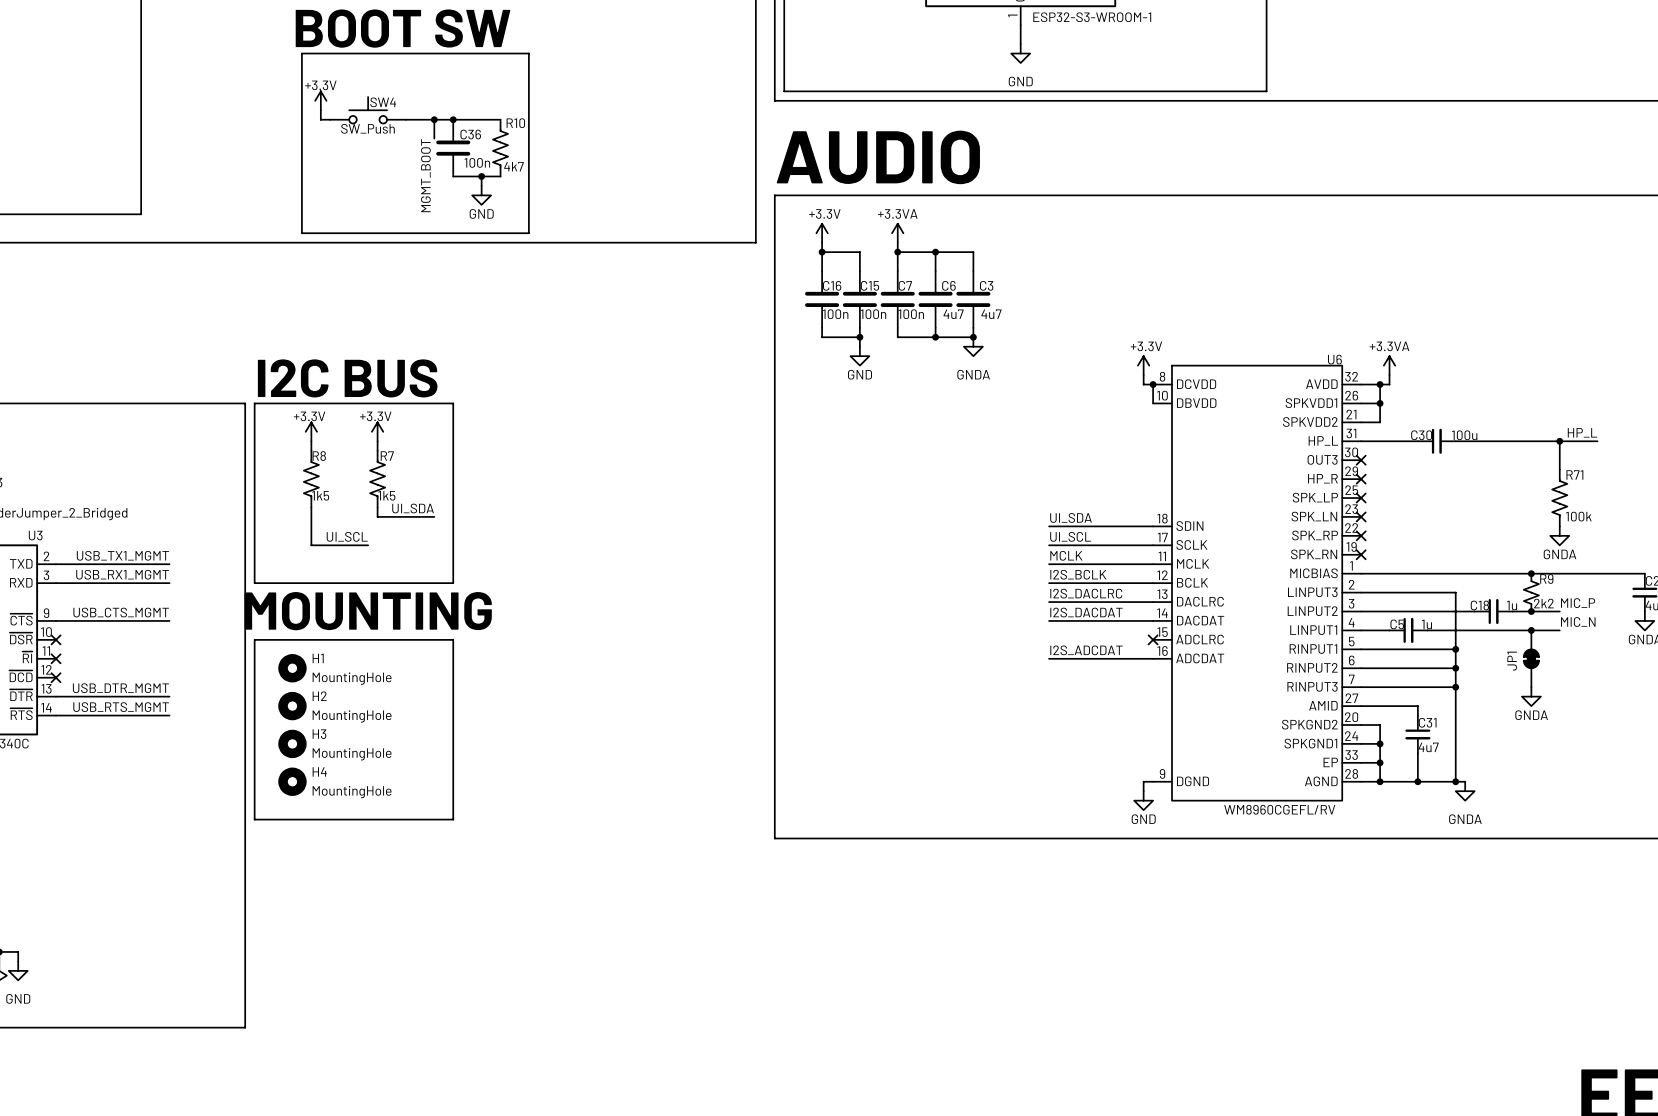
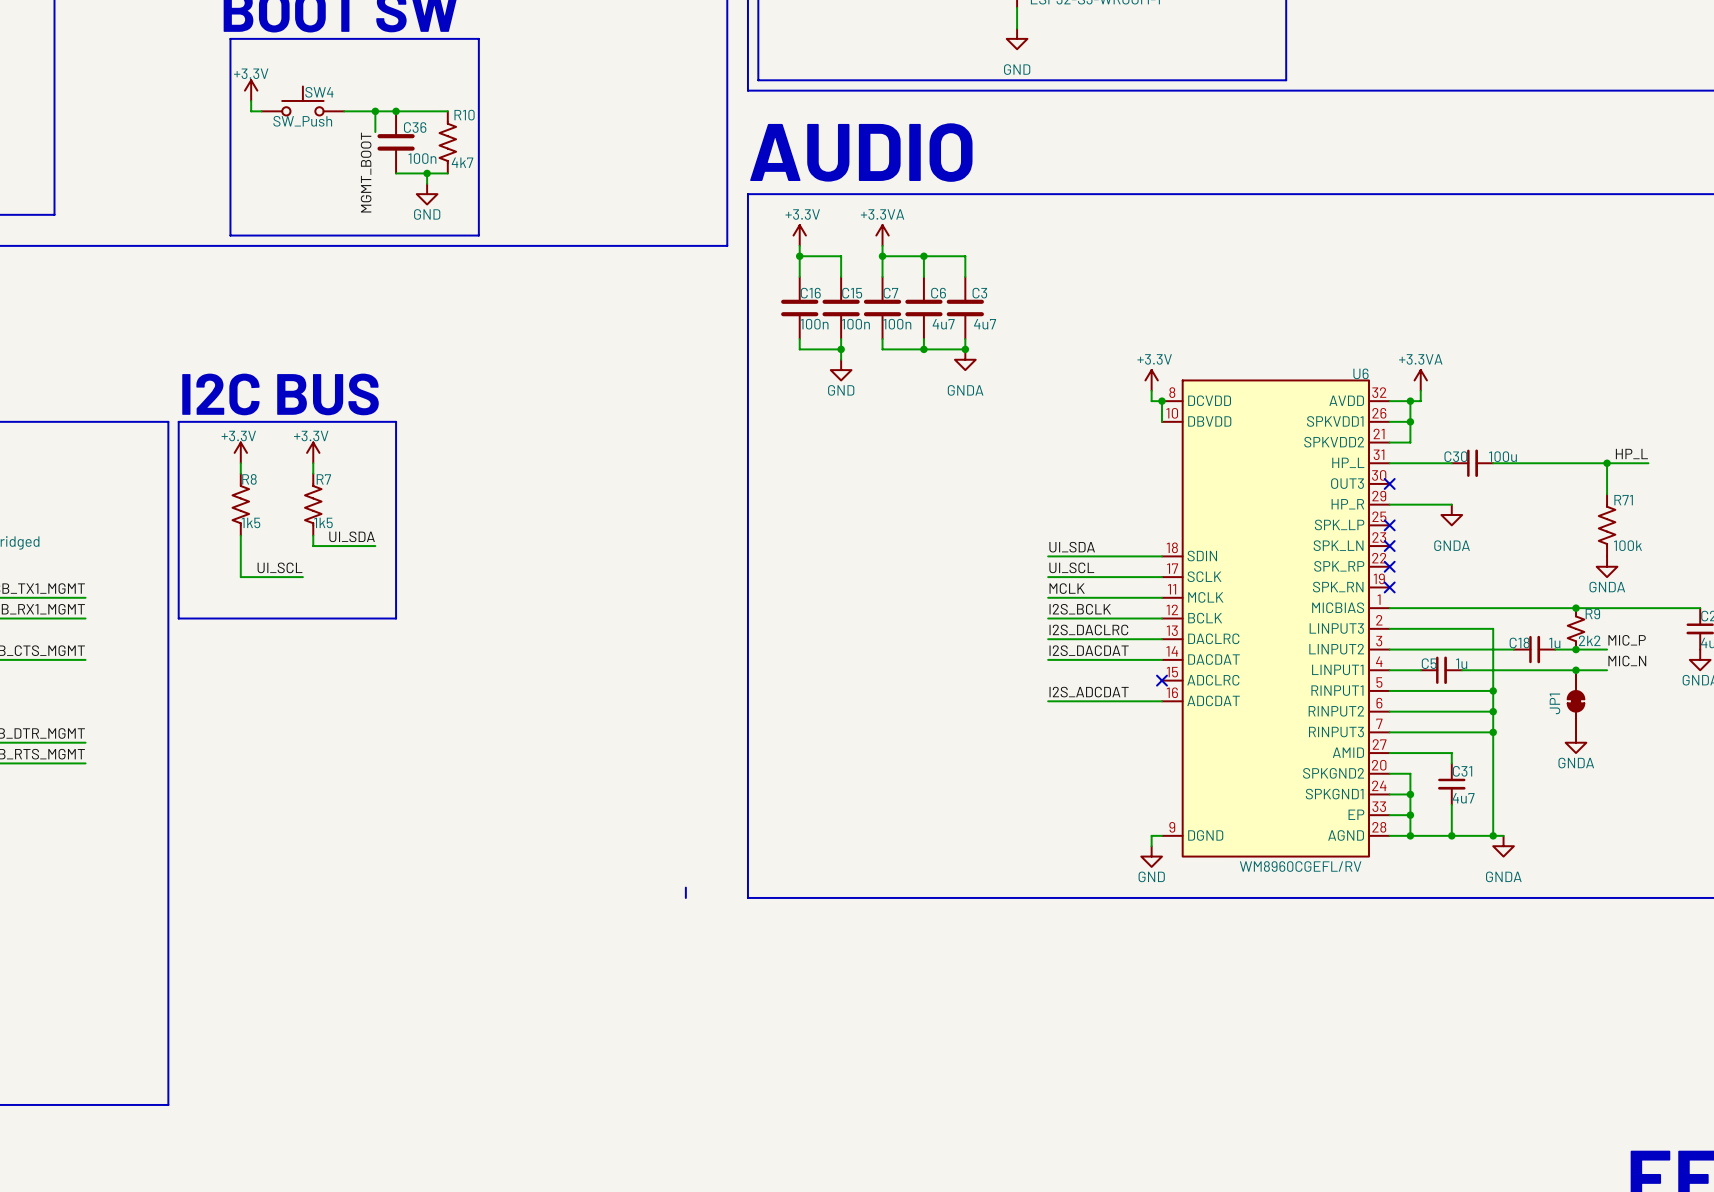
wire: none -> (1389, 504) (1451, 504)
no-connect mark: (1361, 479) -> none
power symbol: none -> GNDA (1451, 515)
text: MOUNTING (368, 611) -> none
line: (254, 639) (254, 819) (453, 819) (453, 639) (254, 639) -> none
H1: MountingHole (292, 668) -> none
H2: MountingHole (292, 706) -> none
H3: MountingHole (292, 743) -> none
H4: MountingHole (292, 781) -> none
line: none -> (685, 887) (685, 897)

